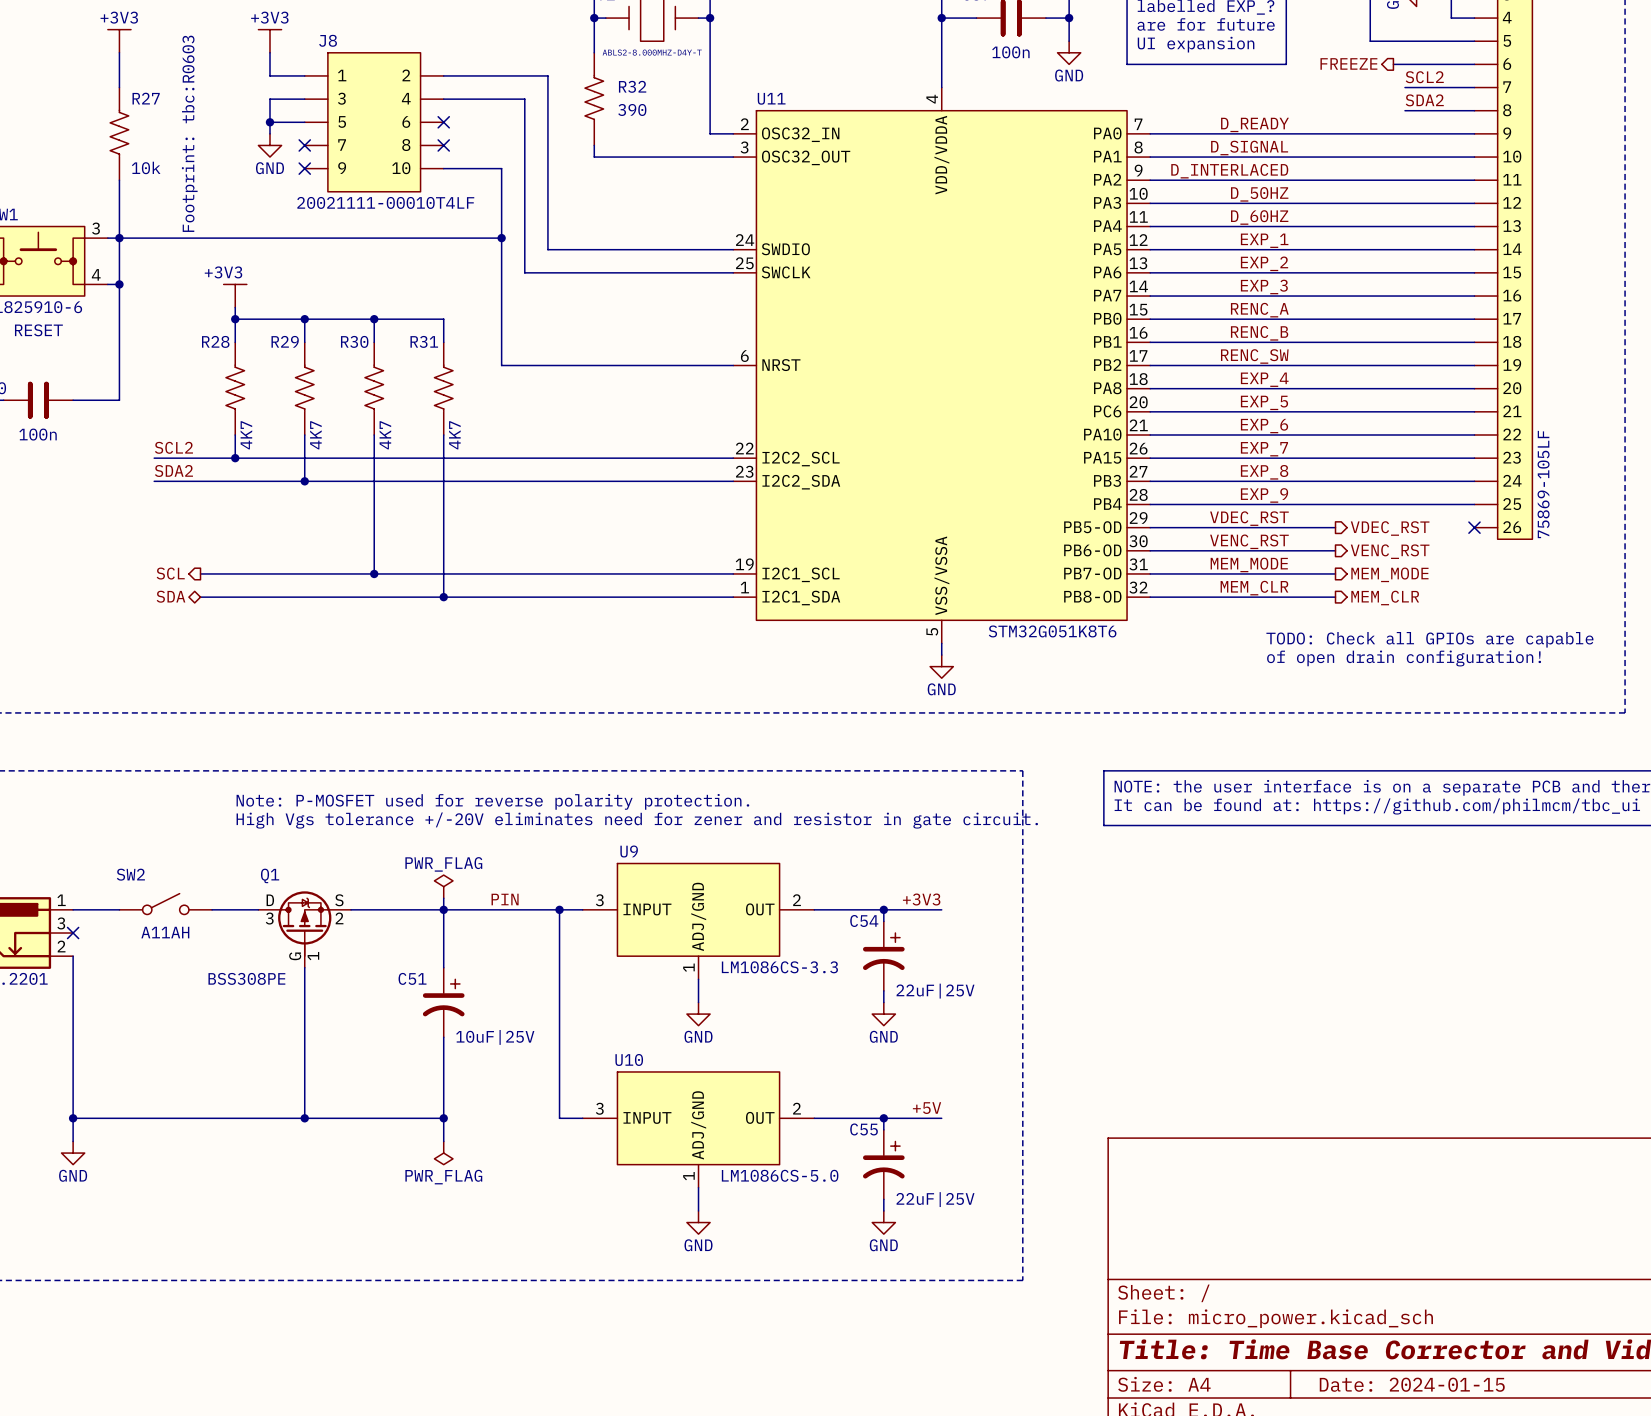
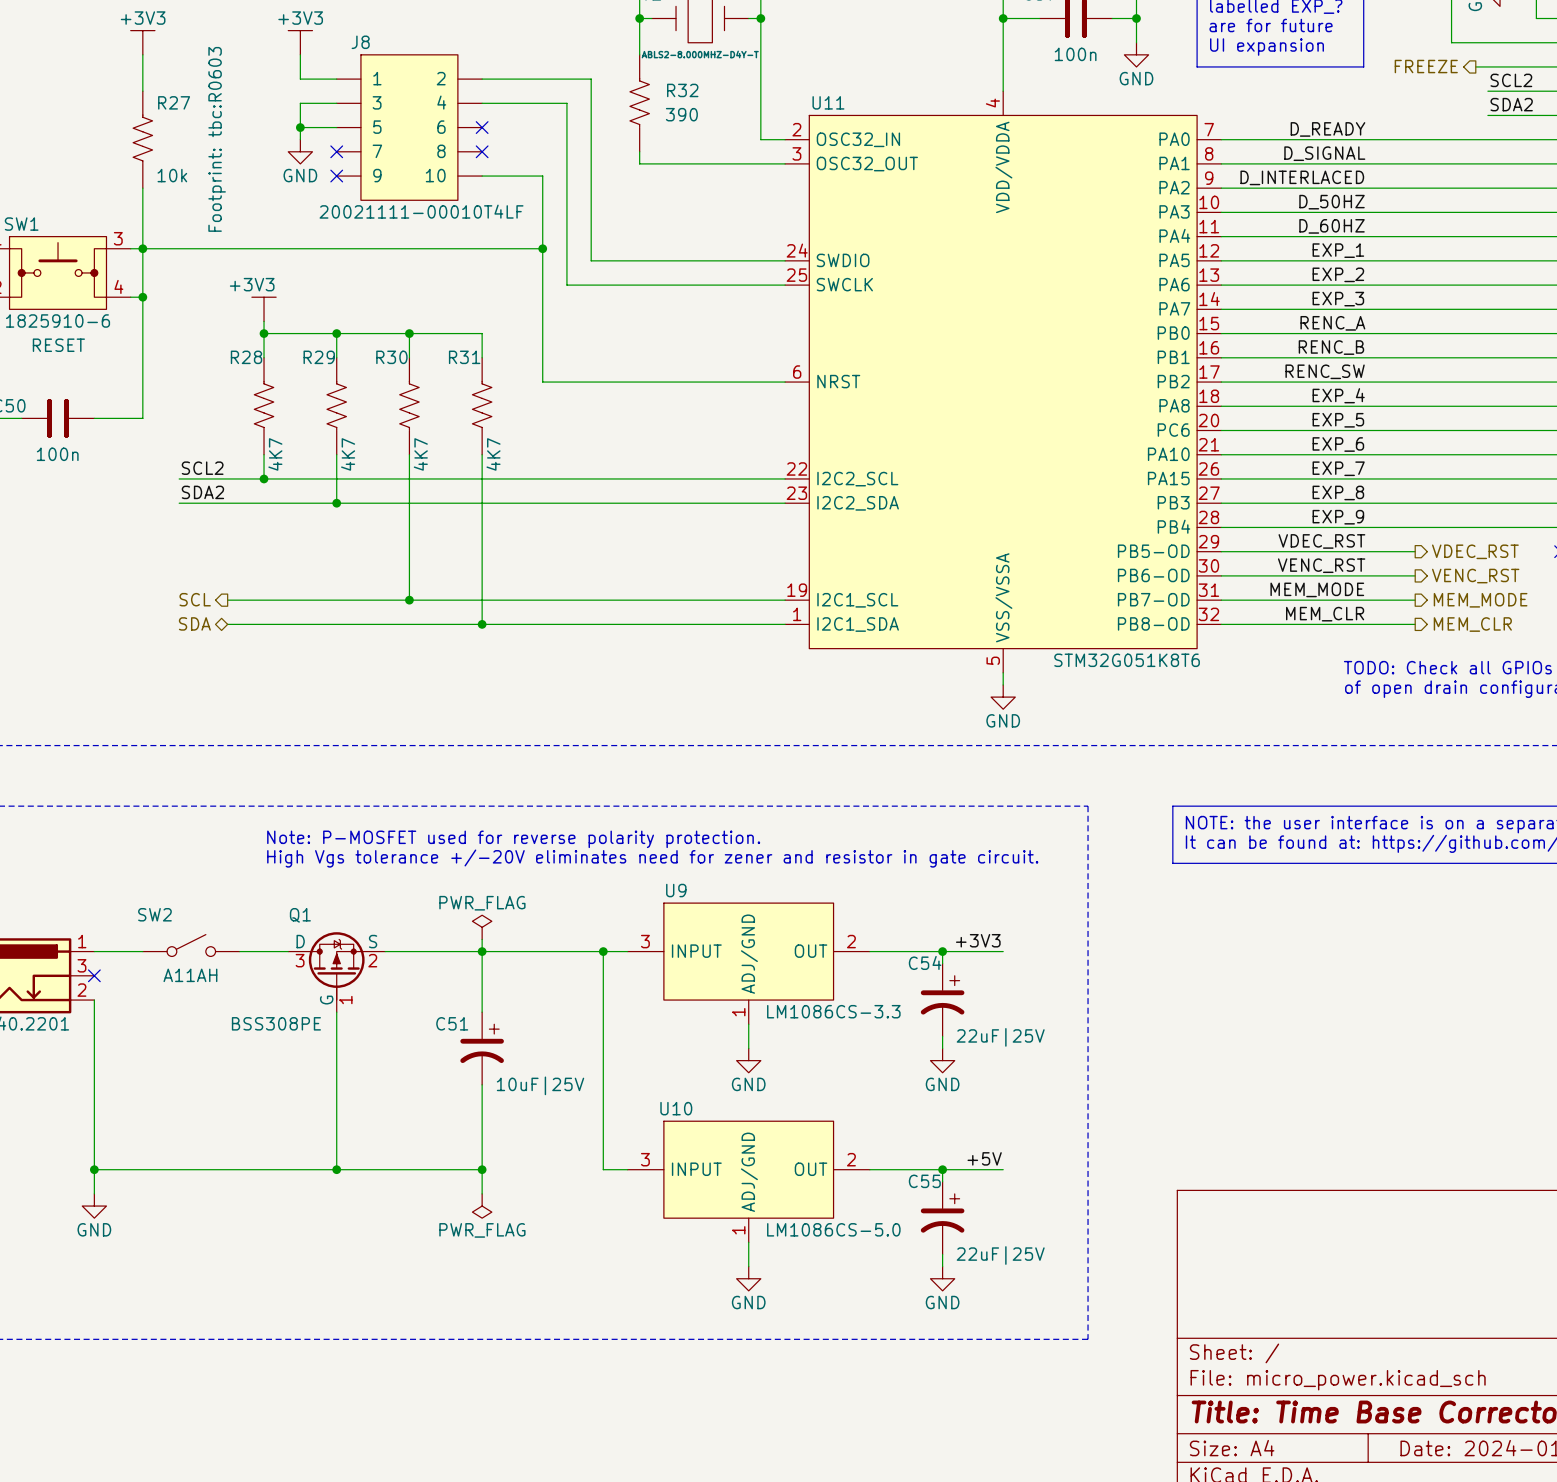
label: PIN (505, 899) -> none

